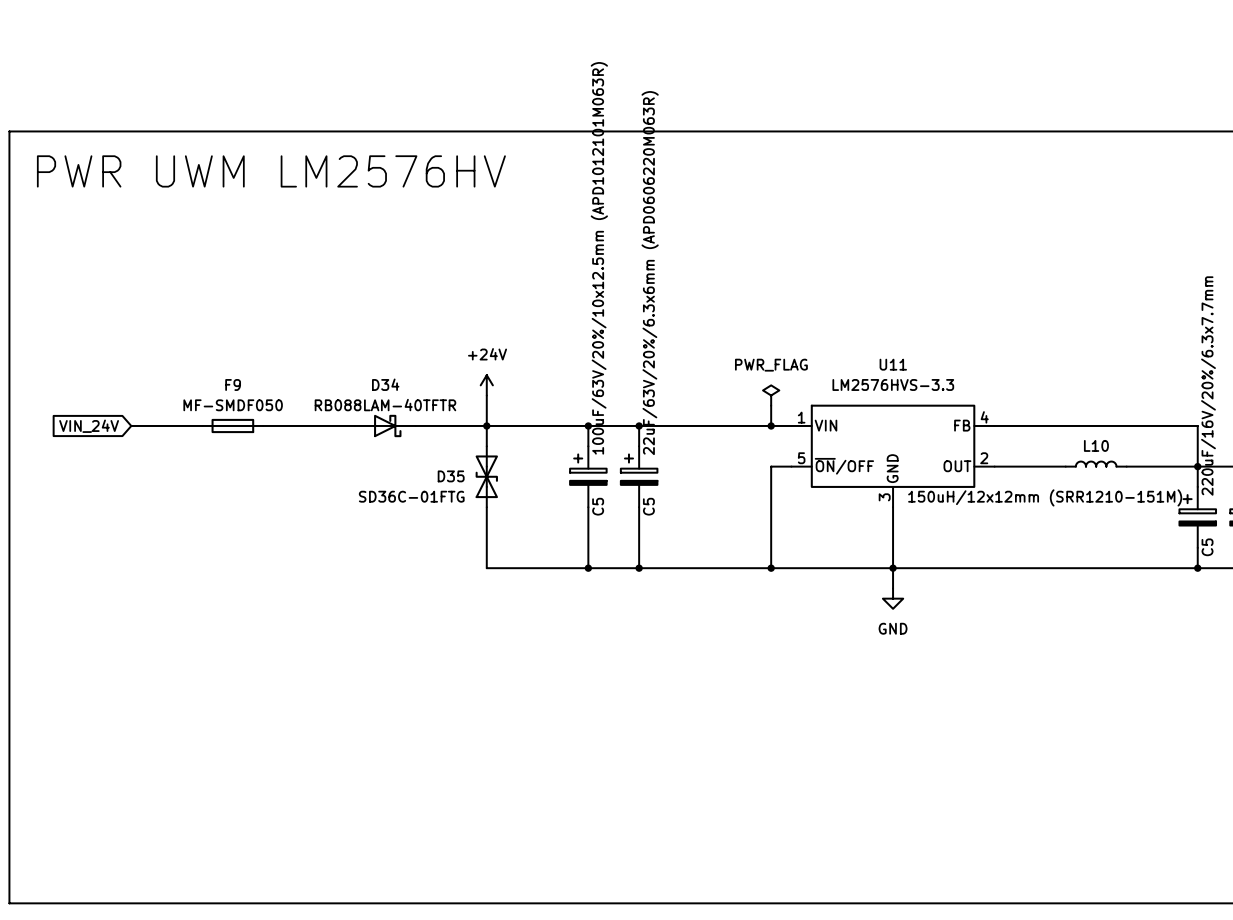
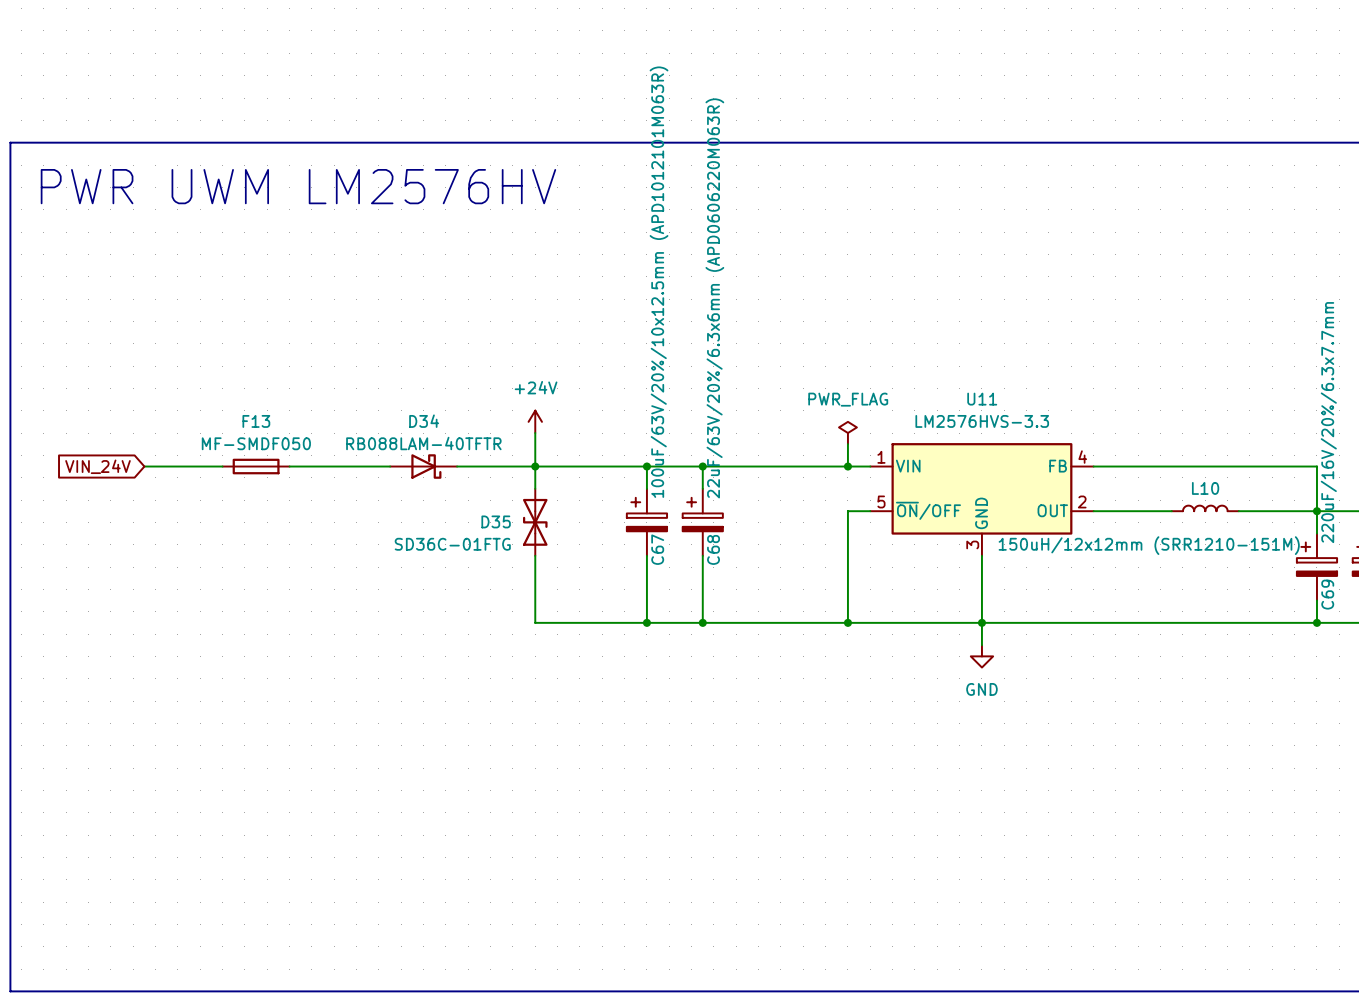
F9 name: F9 (233, 384) -> F13 (256, 421)
C5 name: C5 (598, 506) -> C67 (657, 549)
C5 name: C5 (648, 506) -> C68 (713, 549)
C5 name: C5 (1207, 547) -> C69 (1327, 594)

